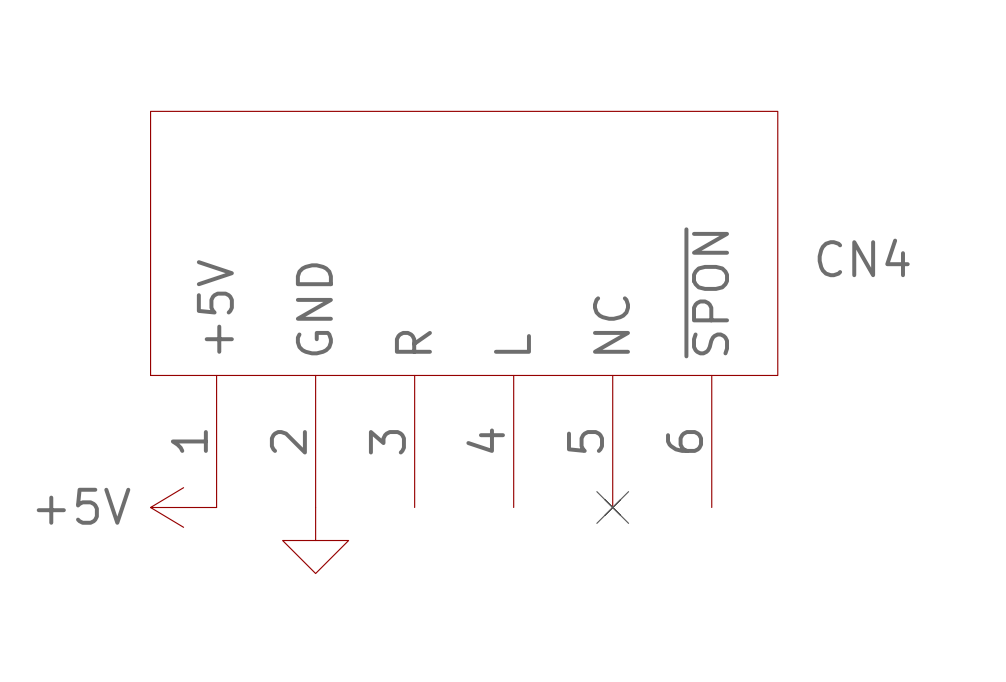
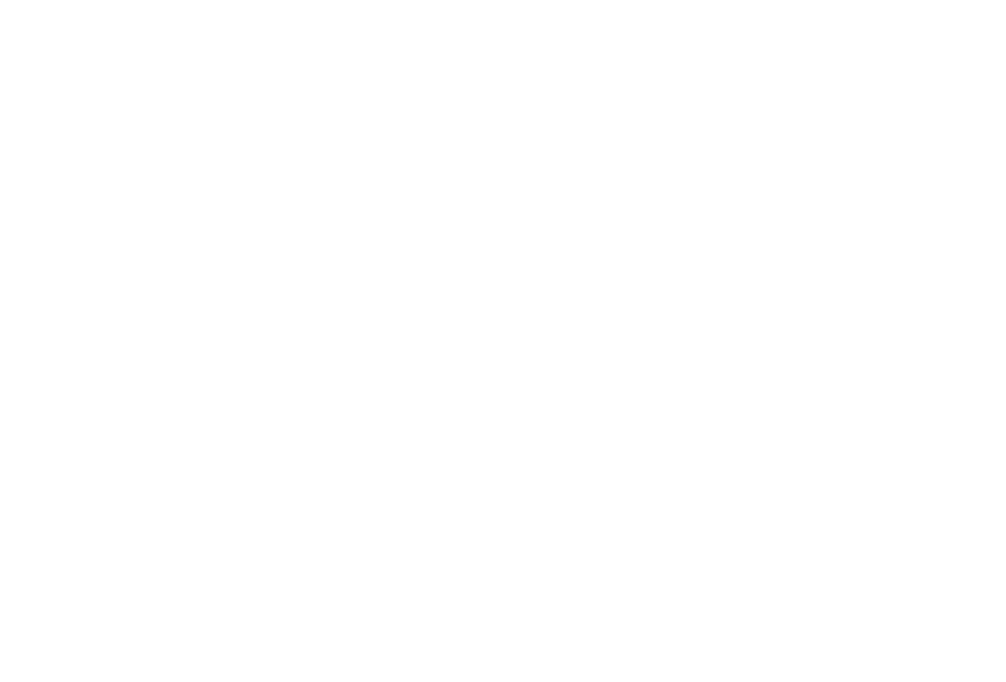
CN4: (464, 313) -> none
power symbol: +5V (183, 507) -> none
no-connect mark: (612, 507) -> none
power symbol: (315, 540) -> none

